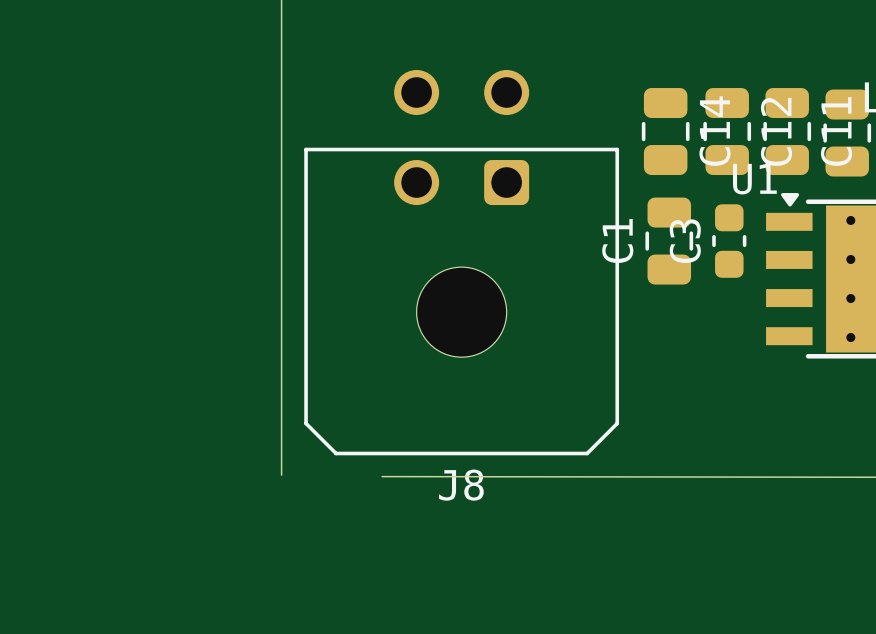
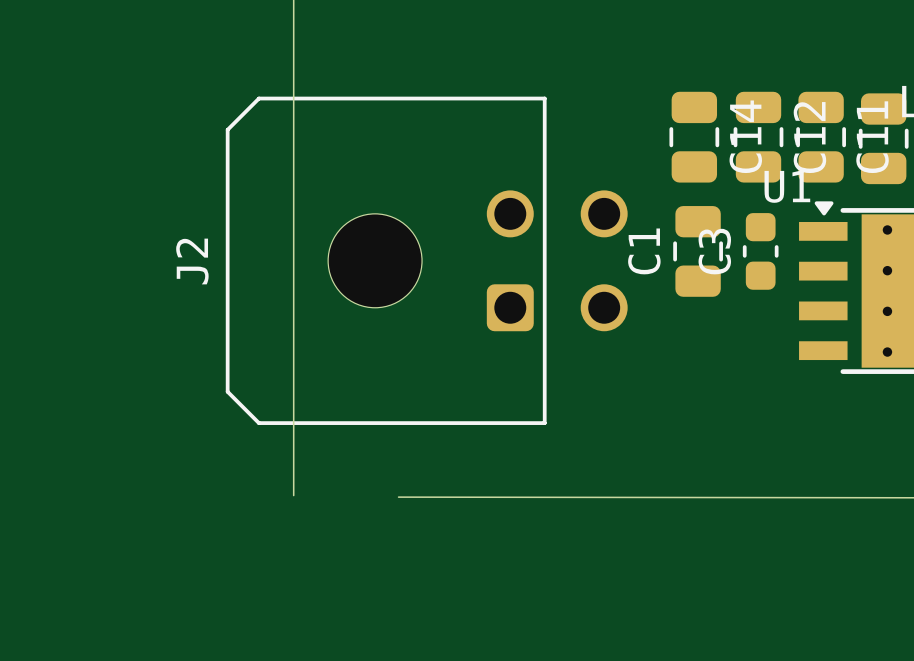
J2: none -> (426, 260)
J8: (461, 262) -> none

